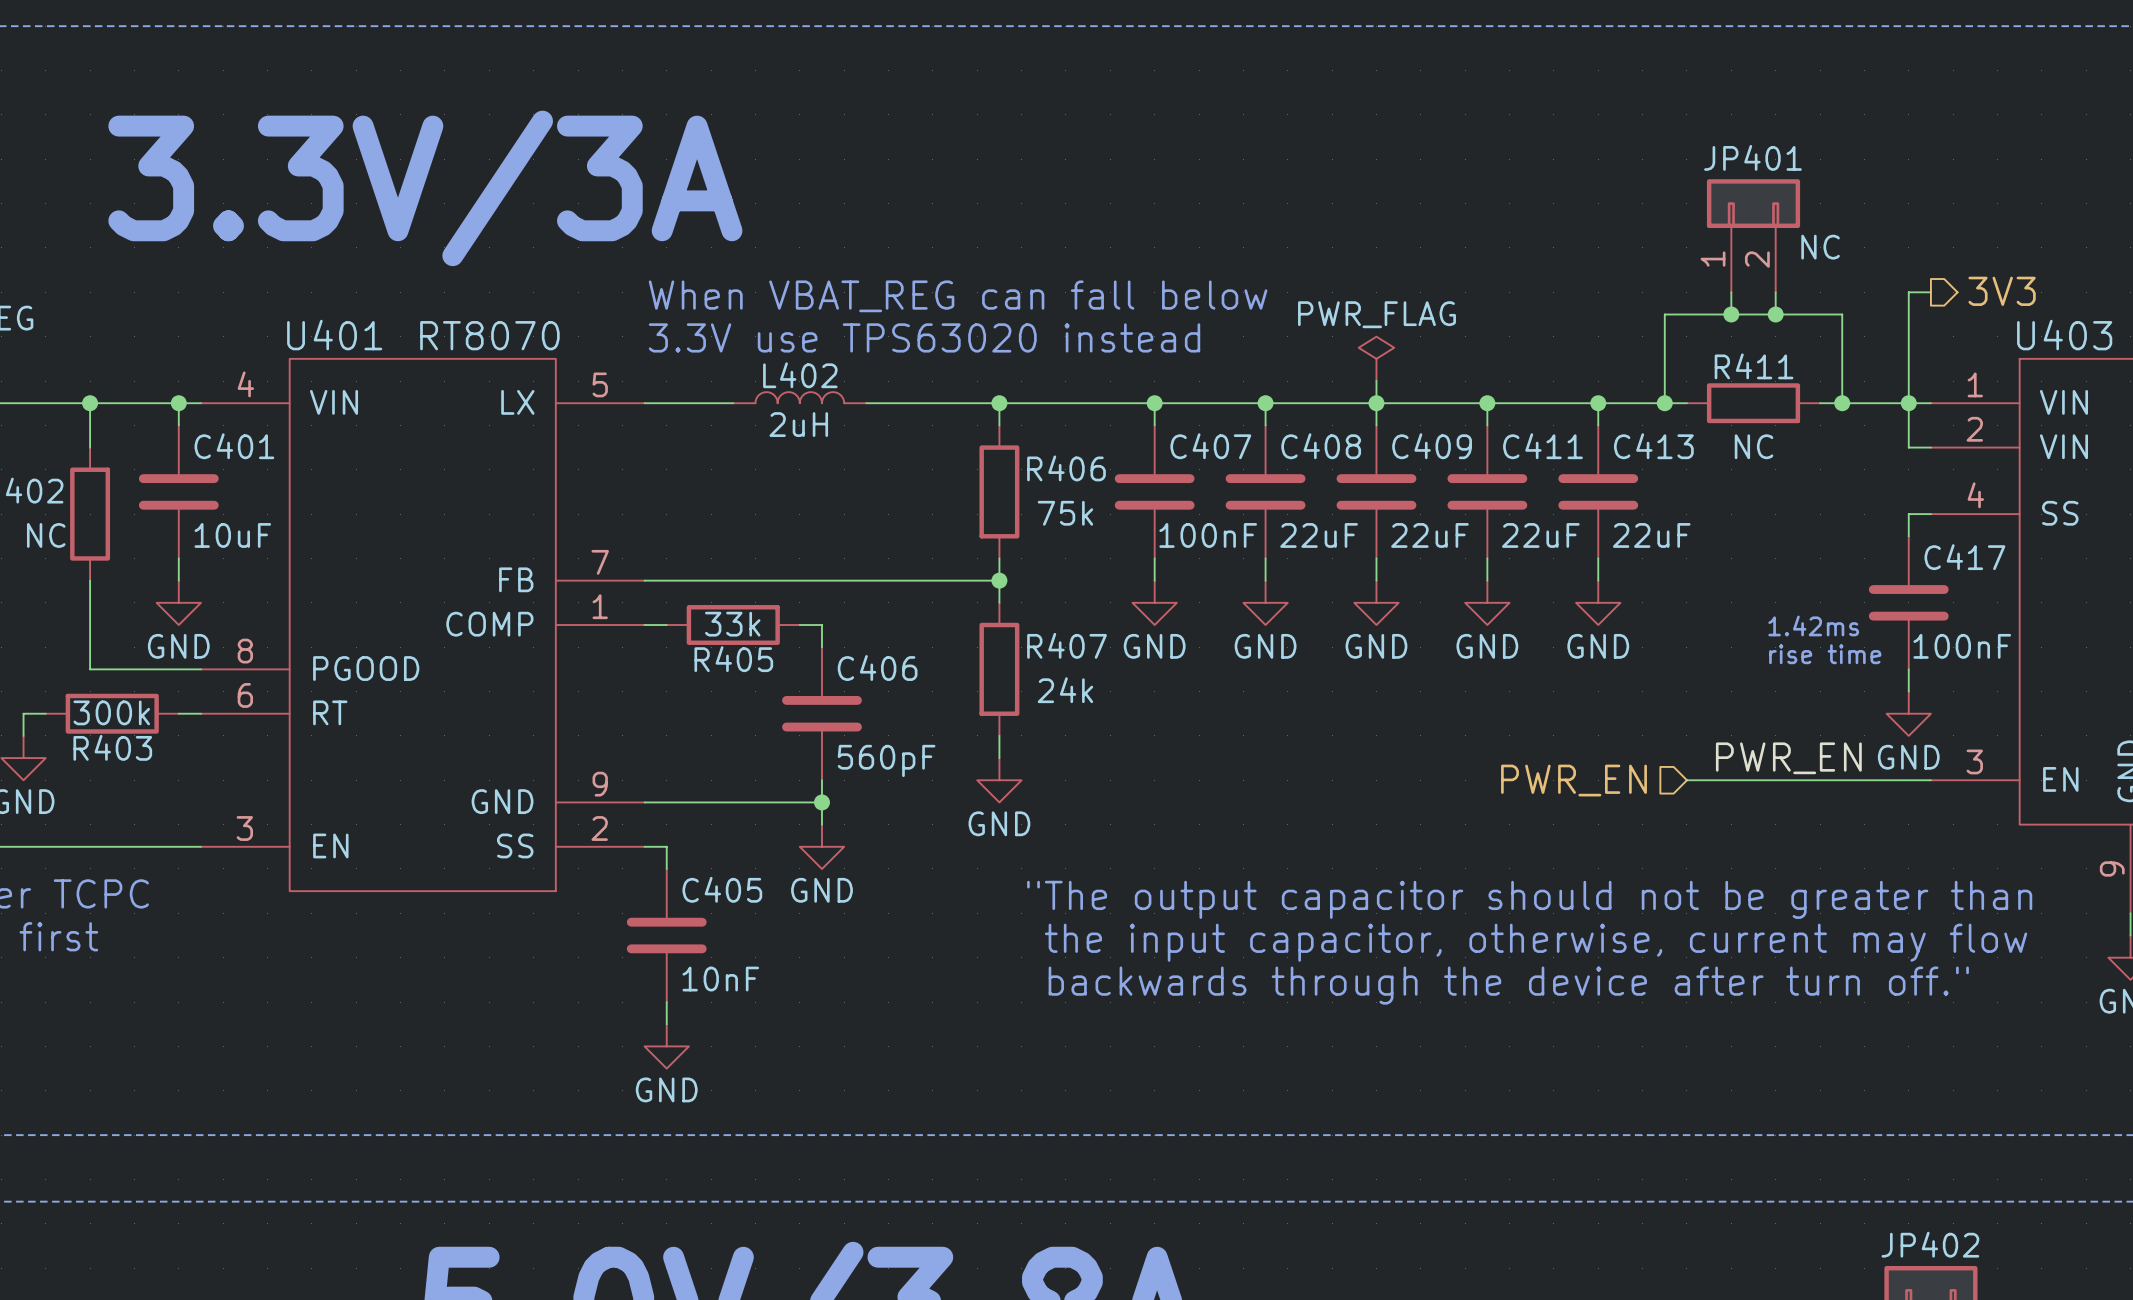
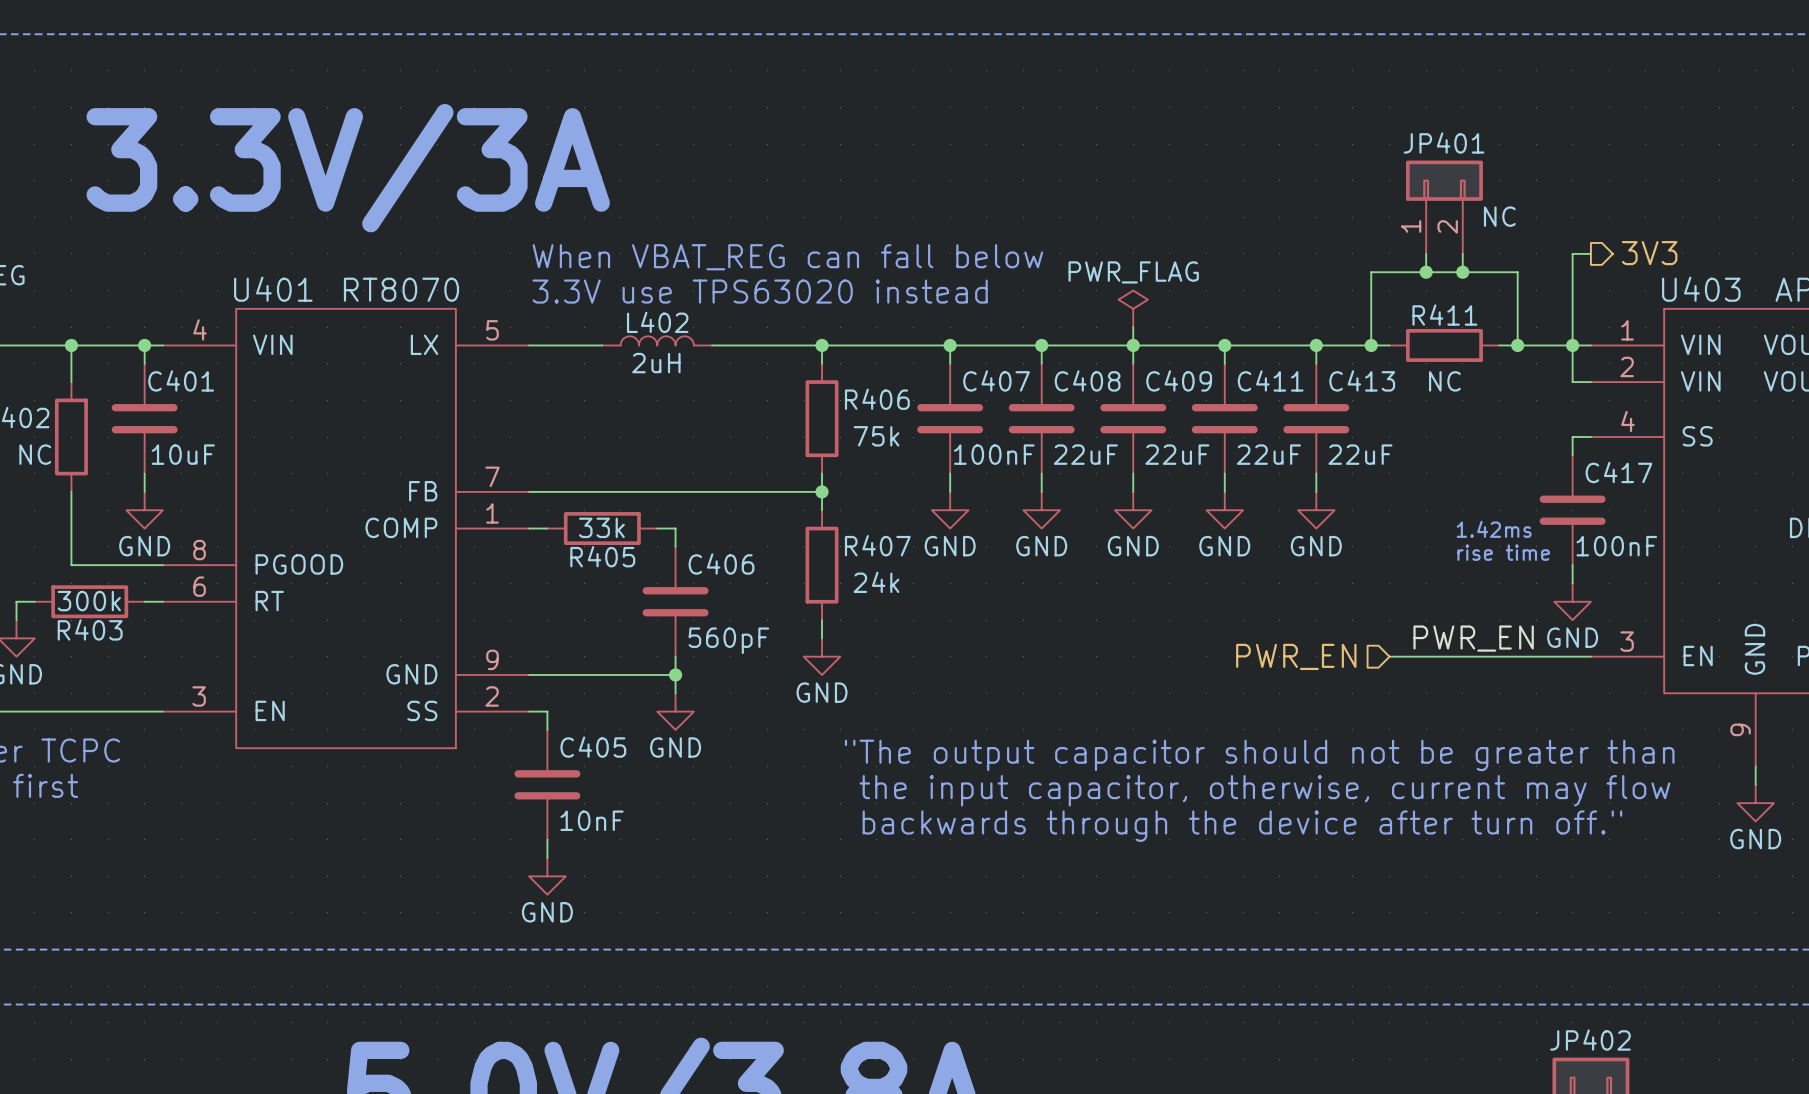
C401 name position: C401 (234, 446) -> C401 (181, 380)
C401 value position: 10uF (232, 535) -> 10uF (183, 454)

